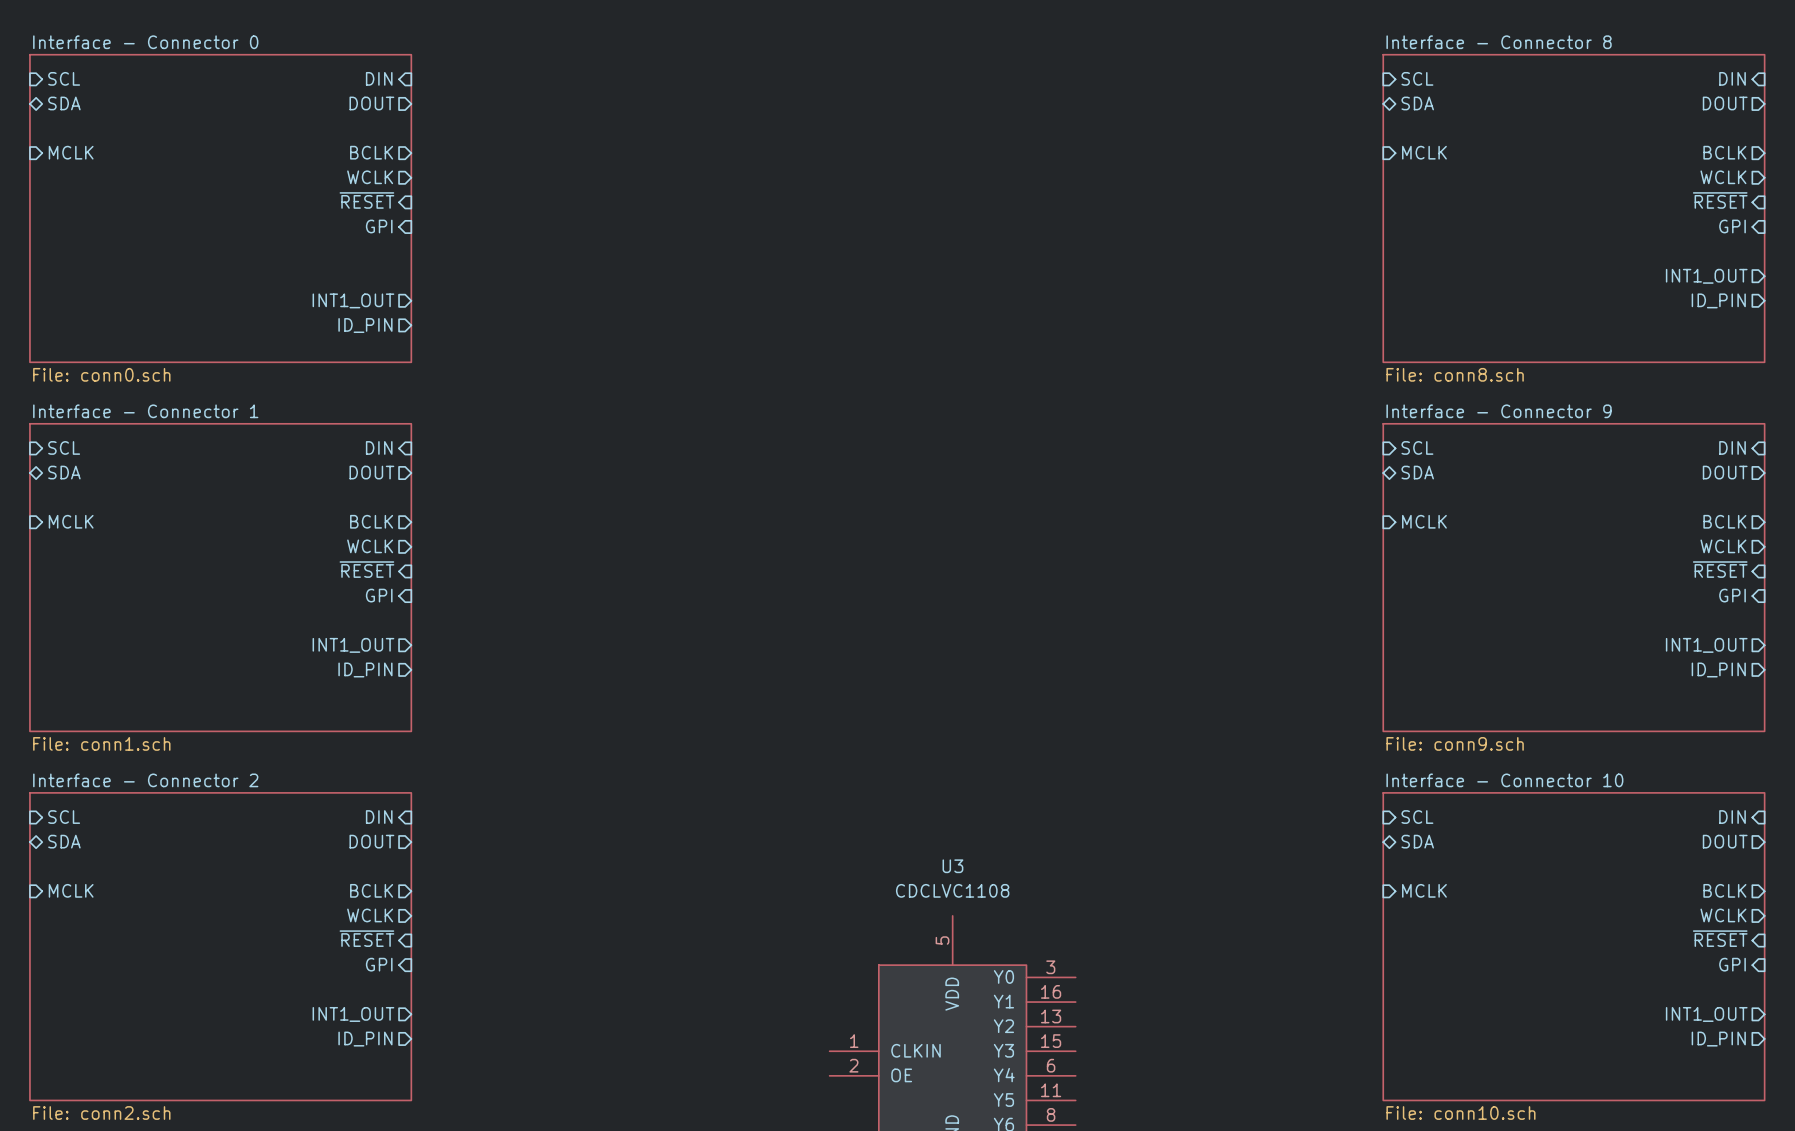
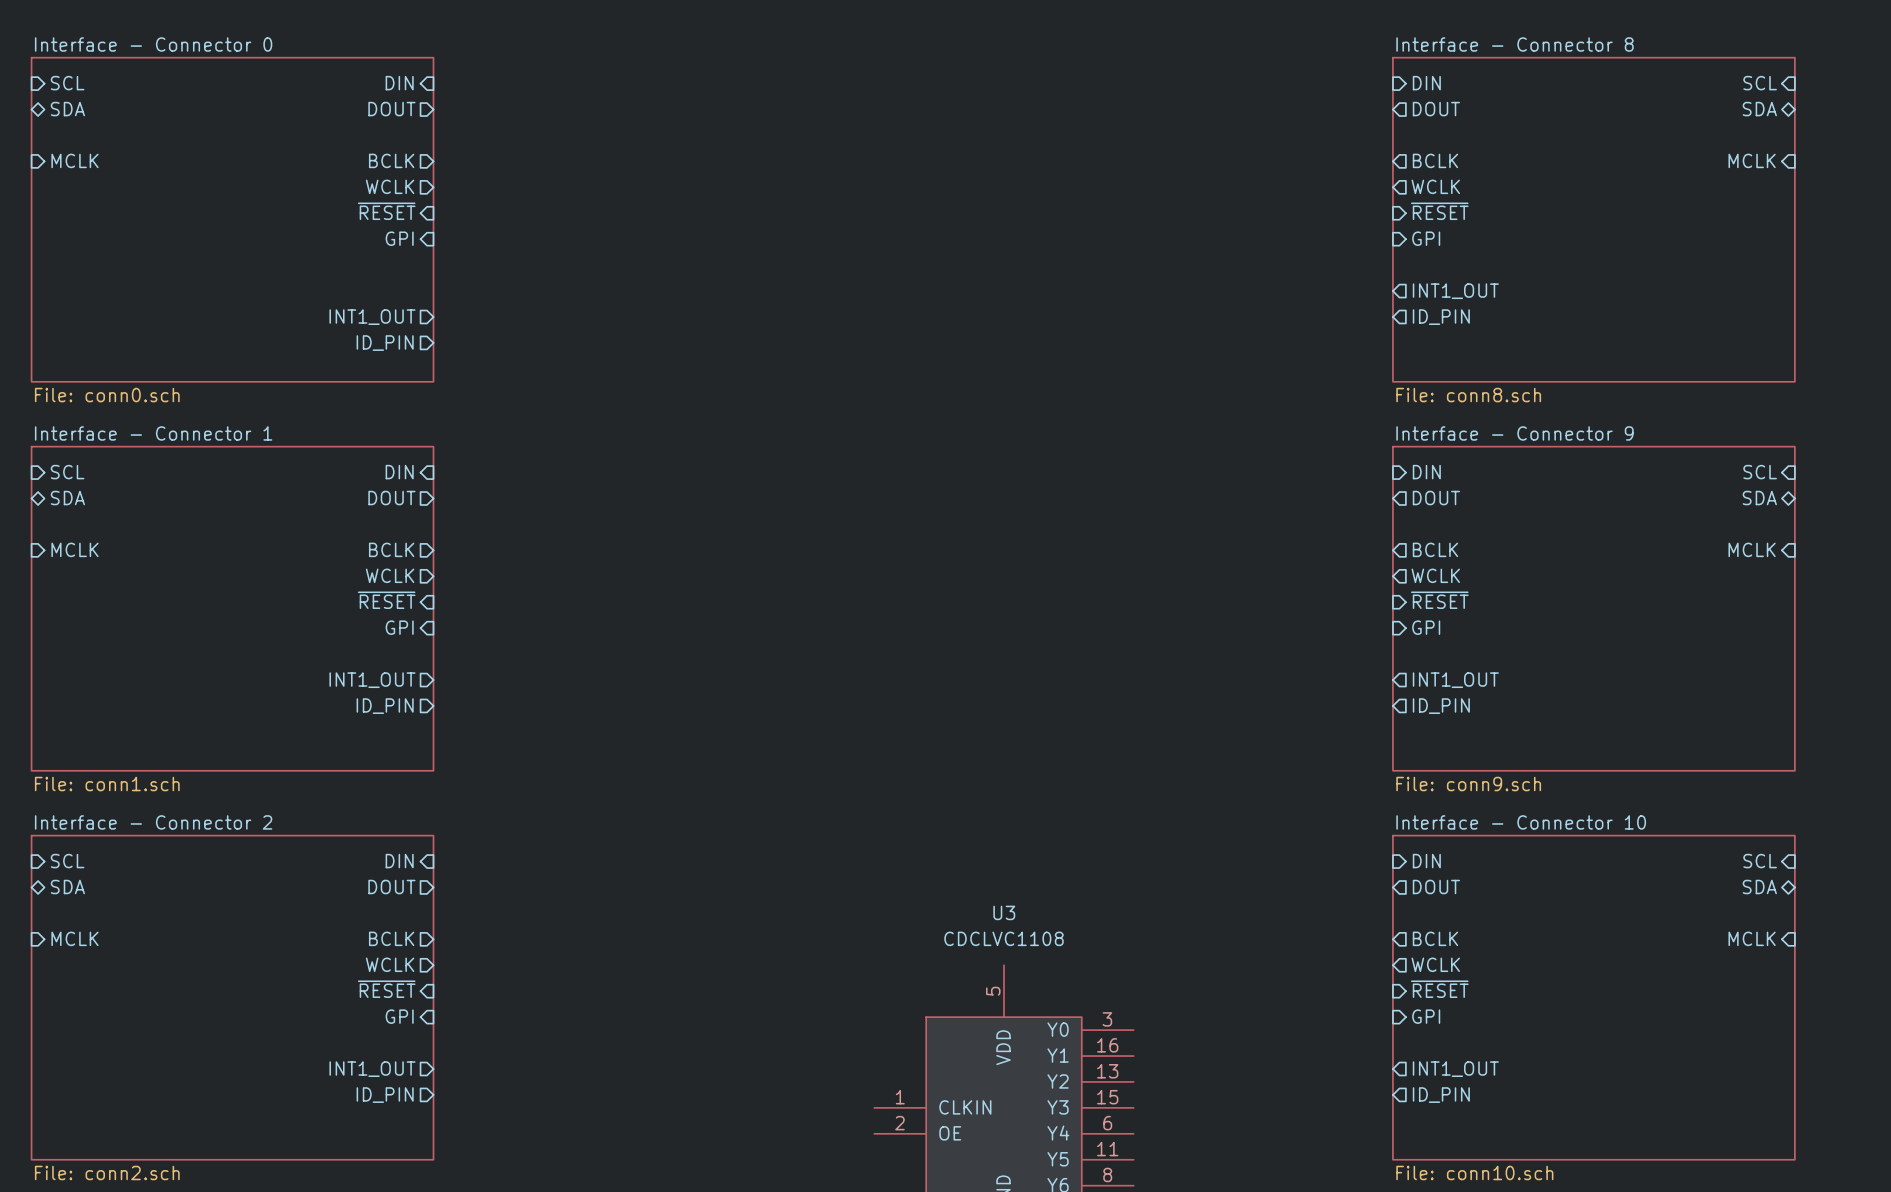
sheet pin: none -> DIN (1426, 83)
sheet pin: SCL (1417, 78) -> none
sheet pin: none -> SCL (1760, 83)
sheet pin: DIN (1732, 78) -> none
sheet pin: none -> DOUT (1436, 109)
sheet pin: SDA (1417, 103) -> none
sheet pin: none -> SDA (1759, 109)
sheet pin: DOUT (1725, 103) -> none
sheet pin: none -> BCLK (1435, 160)
sheet pin: MCLK (1424, 152) -> none
sheet pin: none -> MCLK (1752, 160)
sheet pin: BCLK (1724, 152) -> none
sheet pin: none -> WCLK (1435, 186)
sheet pin: WCLK (1723, 177) -> none
sheet pin: none -> ~{RESET} (1439, 211)
sheet pin: ~{RESET} (1720, 200) -> none
sheet Interface - Connector 8 position: (1573, 208) -> (1593, 219)
sheet pin: none -> GPI (1426, 238)
sheet pin: GPI (1732, 226) -> none
sheet pin: none -> INT1_OUT (1455, 291)
sheet pin: INT1_OUT (1706, 276) -> none
sheet pin: none -> ID_PIN (1441, 317)
sheet pin: ID_PIN (1718, 300) -> none
sheet pin: none -> DIN (1426, 472)
sheet pin: SCL (1417, 447) -> none
sheet pin: none -> SCL (1760, 472)
sheet pin: DIN (1732, 447) -> none
sheet pin: none -> DOUT (1436, 498)
sheet pin: SDA (1417, 472) -> none
sheet pin: none -> SDA (1759, 498)
sheet pin: DOUT (1725, 472) -> none
sheet pin: none -> BCLK (1435, 549)
sheet pin: MCLK (1424, 521) -> none
sheet pin: none -> MCLK (1752, 549)
sheet pin: BCLK (1724, 521) -> none
sheet pin: none -> WCLK (1435, 575)
sheet pin: WCLK (1723, 546) -> none
sheet pin: none -> ~{RESET} (1439, 600)
sheet pin: ~{RESET} (1720, 569) -> none
sheet Interface - Connector 9 position: (1573, 577) -> (1593, 608)
sheet pin: none -> GPI (1426, 627)
sheet pin: GPI (1732, 595) -> none
sheet pin: none -> INT1_OUT (1455, 680)
sheet pin: INT1_OUT (1706, 645) -> none
sheet pin: none -> ID_PIN (1441, 706)
sheet pin: ID_PIN (1718, 669) -> none
sheet pin: none -> DIN (1426, 861)
sheet pin: SCL (1417, 817) -> none
sheet pin: none -> SCL (1760, 861)
sheet pin: DIN (1732, 817) -> none
sheet pin: none -> DOUT (1436, 886)
sheet pin: SDA (1417, 841) -> none
sheet pin: none -> SDA (1759, 886)
sheet pin: DOUT (1725, 841) -> none
sheet pin: none -> BCLK (1435, 938)
sheet pin: MCLK (1424, 890) -> none
sheet pin: none -> MCLK (1752, 938)
sheet pin: BCLK (1724, 890) -> none
sheet pin: none -> WCLK (1435, 964)
sheet pin: WCLK (1723, 915) -> none
sheet pin: none -> ~{RESET} (1439, 989)
sheet pin: ~{RESET} (1720, 938) -> none
sheet Interface - Connector 10 position: (1573, 946) -> (1593, 997)
sheet pin: none -> GPI (1426, 1016)
sheet pin: GPI (1732, 964) -> none
sheet pin: none -> INT1_OUT (1455, 1069)
sheet pin: INT1_OUT (1706, 1014) -> none
sheet pin: none -> ID_PIN (1441, 1095)
sheet pin: ID_PIN (1718, 1039) -> none

